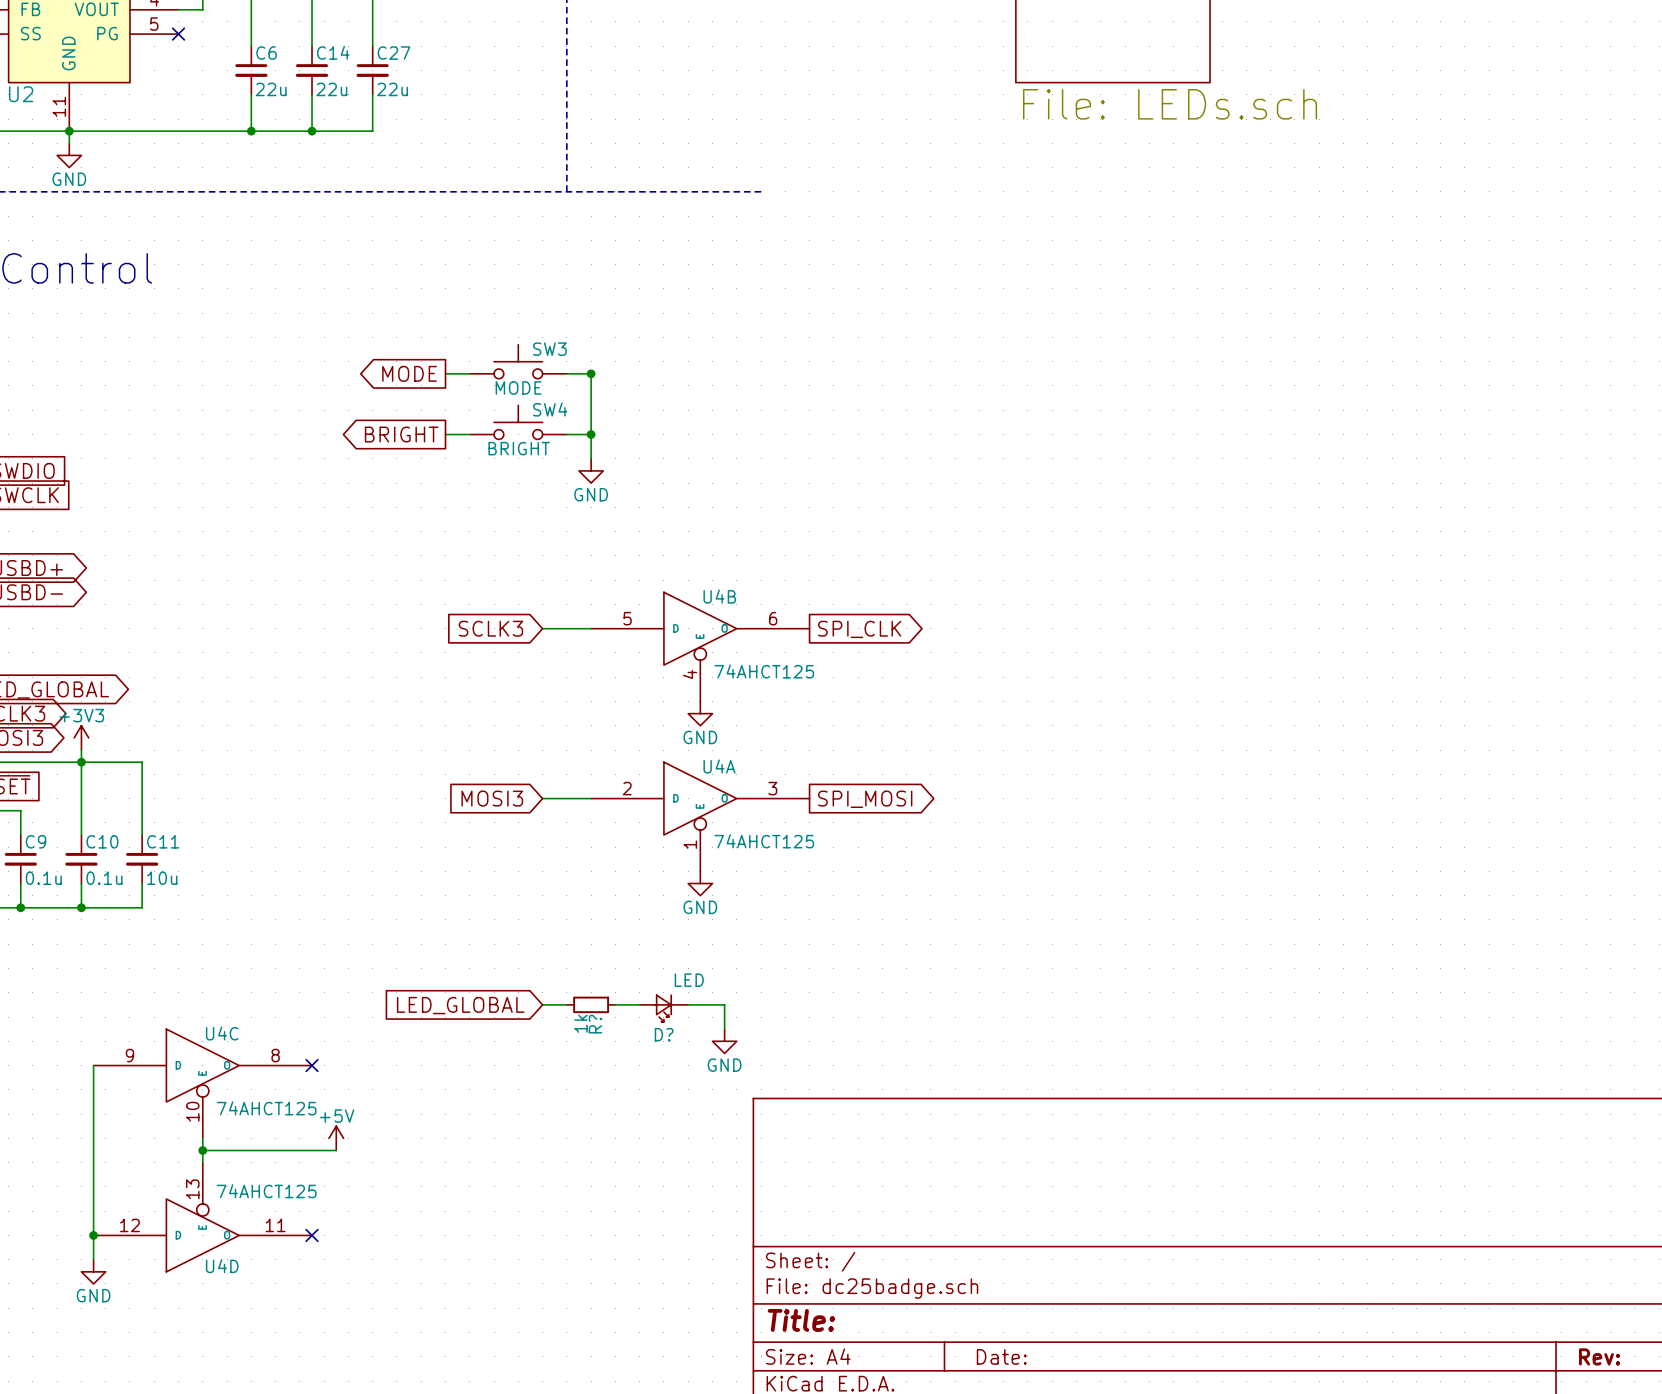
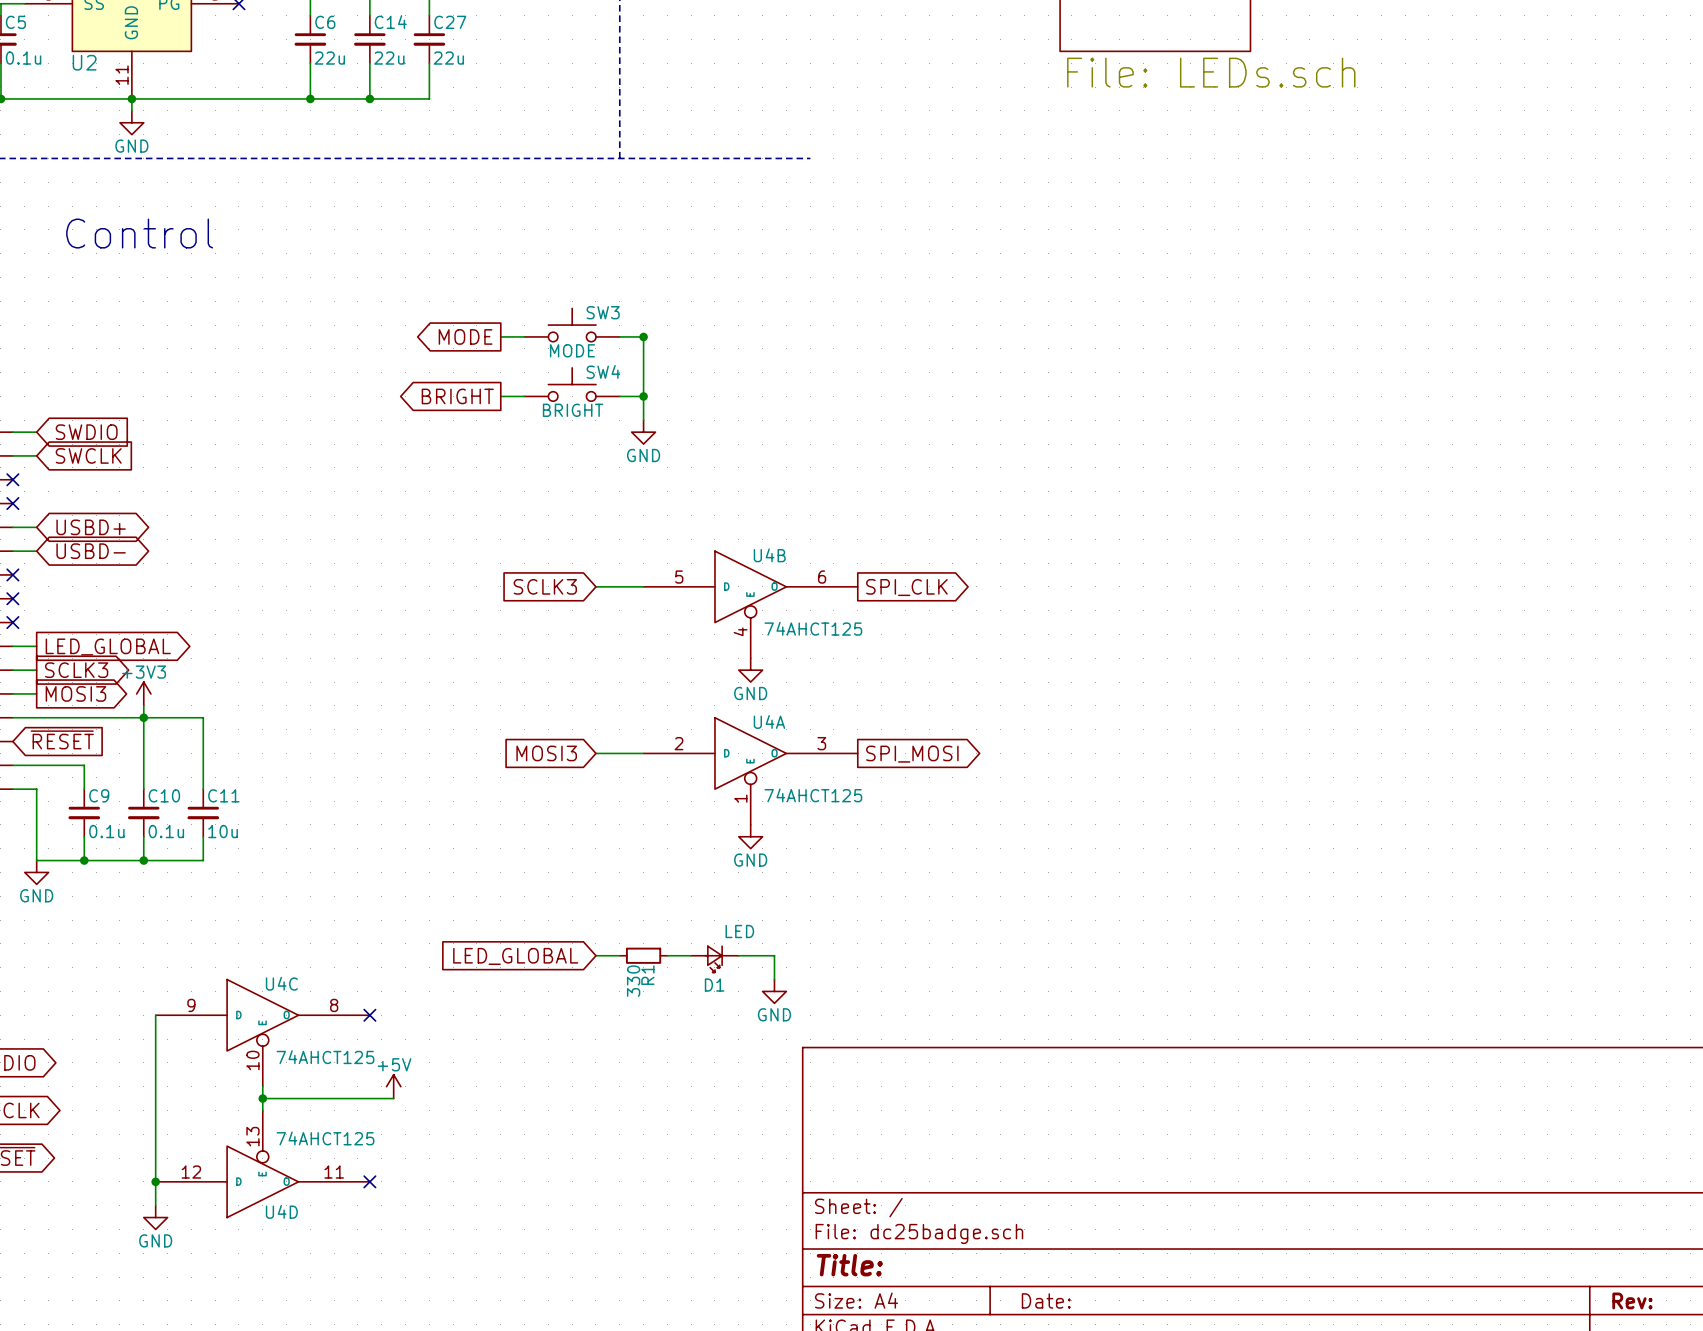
R? value: 1k (580, 1023) -> 330 (633, 981)
R? name: R? (595, 1024) -> R1 (647, 975)
D? name: D? (664, 1034) -> D1 (714, 985)

